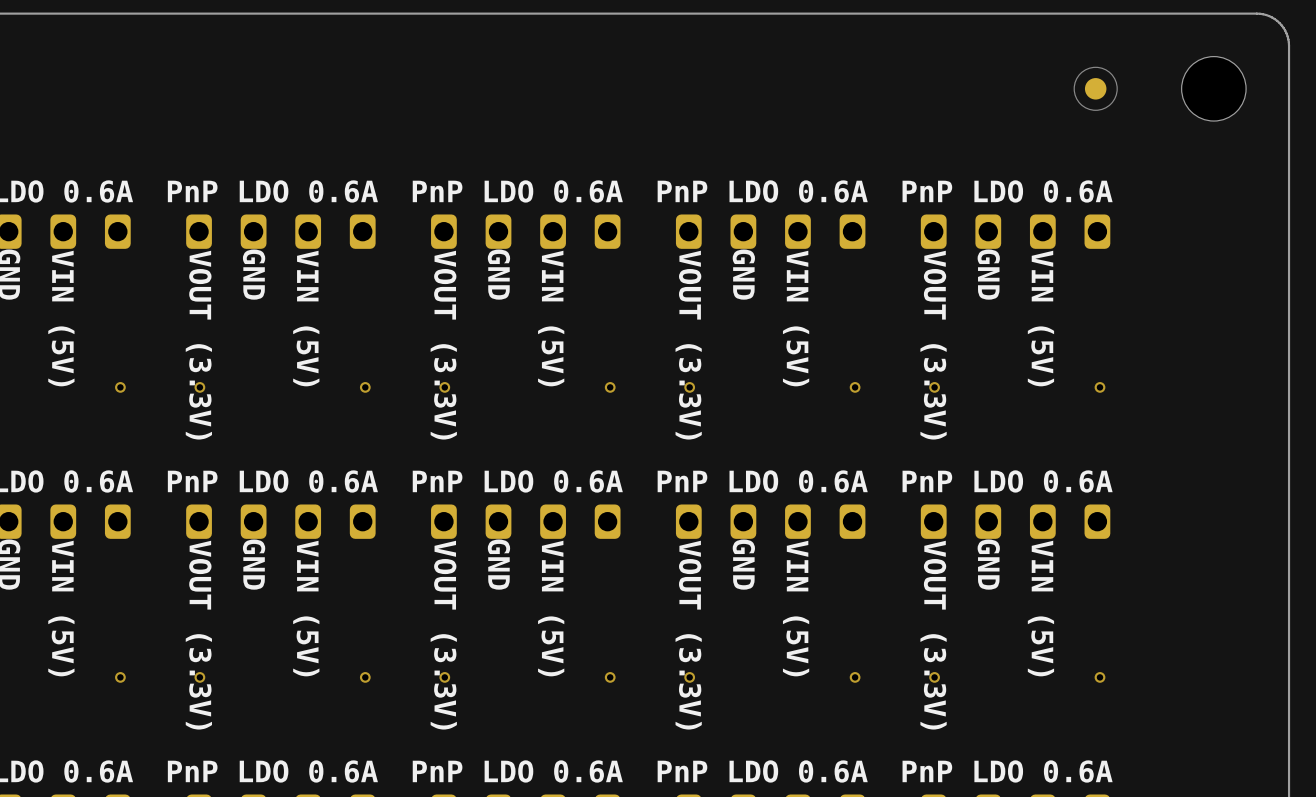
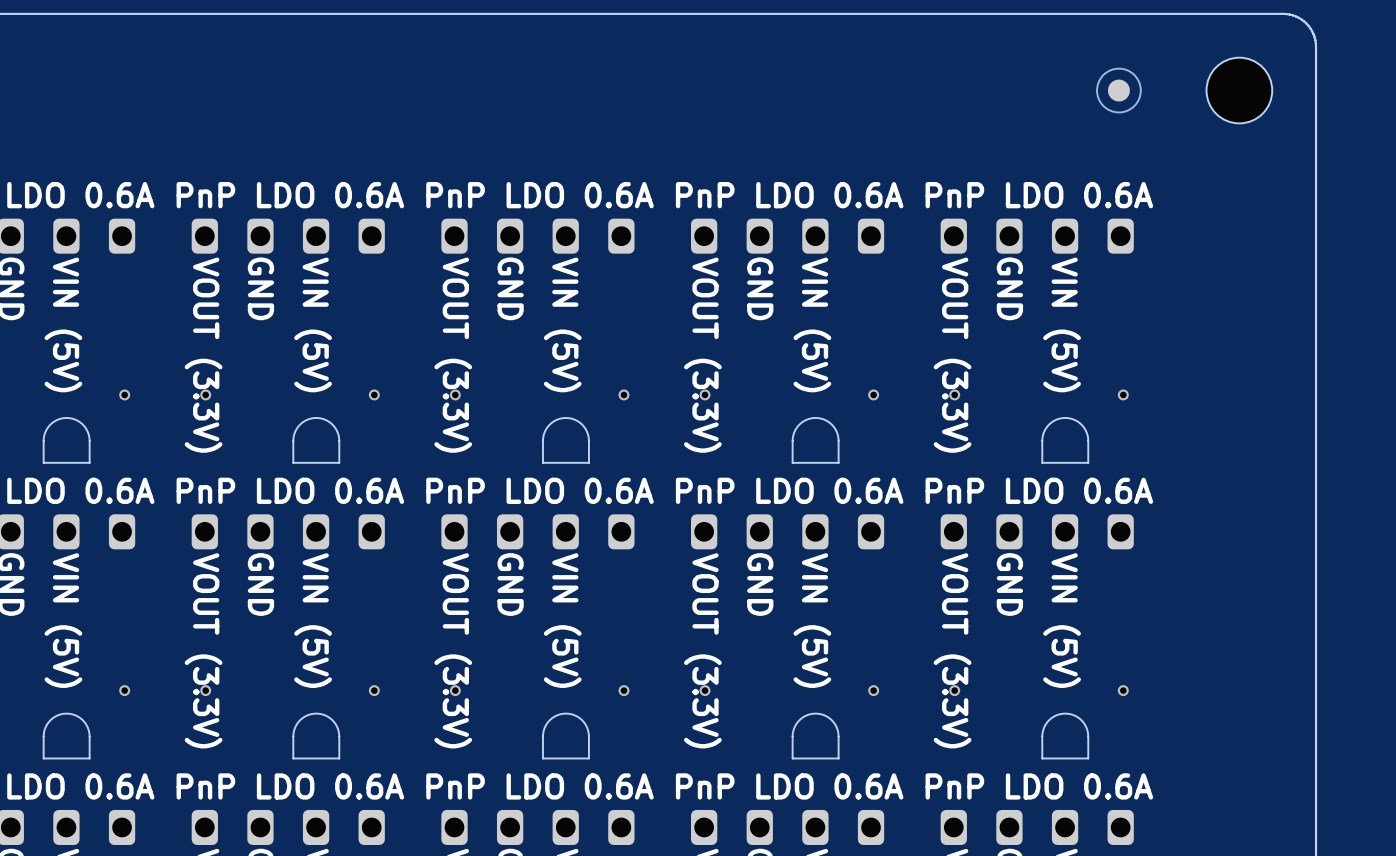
board edge: none -> (89, 440) (89, 462) (43, 462) (44, 434) (50, 424) (57, 419) (66, 417) (78, 421) (86, 429) (89, 440)
board edge: none -> (339, 440) (339, 462) (293, 462) (293, 435) (299, 425) (305, 420) (316, 417) (329, 422) (336, 430) (339, 440)
board edge: none -> (588, 440) (588, 462) (542, 462) (543, 434) (547, 426) (557, 419) (568, 418) (577, 421) (585, 429) (588, 440)
board edge: none -> (838, 440) (838, 462) (792, 462) (793, 434) (799, 424) (806, 419) (815, 417) (827, 421) (835, 429) (838, 440)
board edge: none -> (1088, 440) (1088, 462) (1042, 462) (1042, 435) (1046, 427) (1054, 420) (1065, 417) (1075, 420) (1084, 427) (1088, 440)
board edge: none -> (89, 736) (89, 758) (43, 758) (44, 730) (48, 722) (57, 715) (69, 713) (80, 718) (87, 727) (89, 736)
board edge: none -> (339, 736) (339, 758) (293, 758) (293, 731) (299, 721) (305, 716) (316, 713) (326, 716) (336, 725) (339, 736)
board edge: none -> (588, 736) (588, 758) (542, 758) (543, 730) (549, 720) (557, 715) (568, 713) (577, 716) (585, 725) (588, 736)
board edge: none -> (838, 736) (838, 758) (792, 758) (793, 731) (798, 721) (804, 716) (815, 713) (826, 716) (835, 725) (838, 736)
board edge: none -> (1088, 736) (1088, 758) (1042, 758) (1043, 730) (1049, 720) (1056, 715) (1068, 713) (1079, 718) (1085, 725) (1088, 736)

